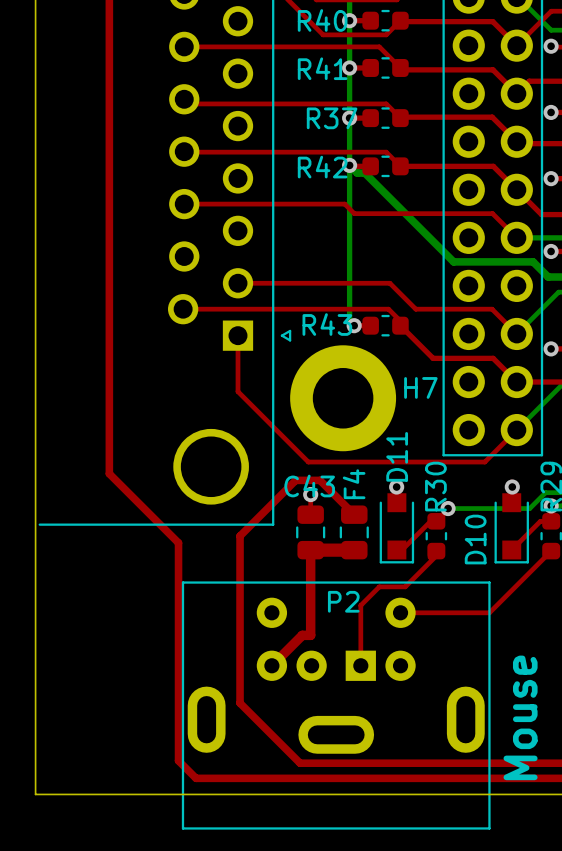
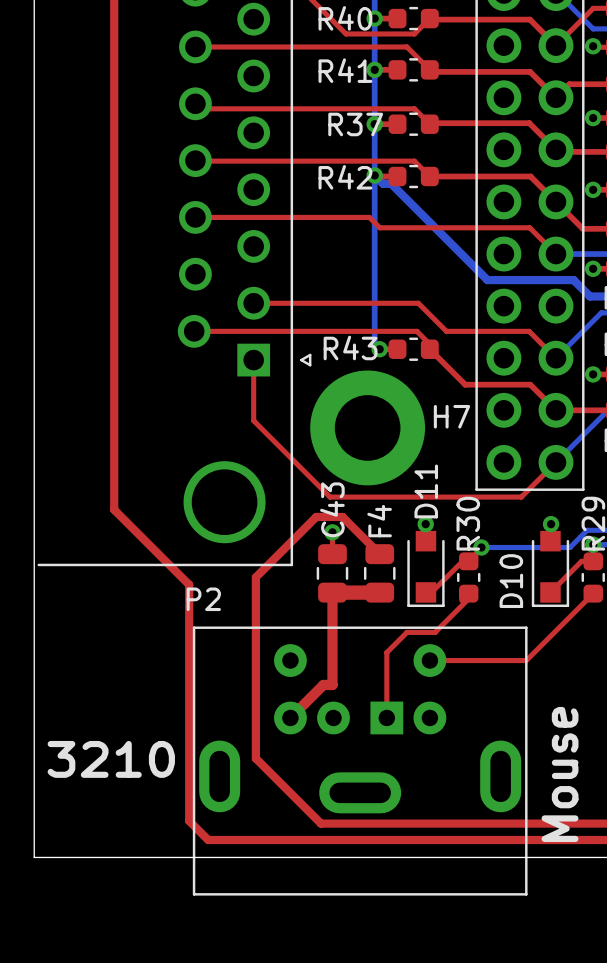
C43 name rotation: 0° (309, 486) -> 90° counterclockwise (332, 509)
P2 name position: P2 (343, 601) -> P2 (203, 599)
text: none -> 3210 (111, 759)

